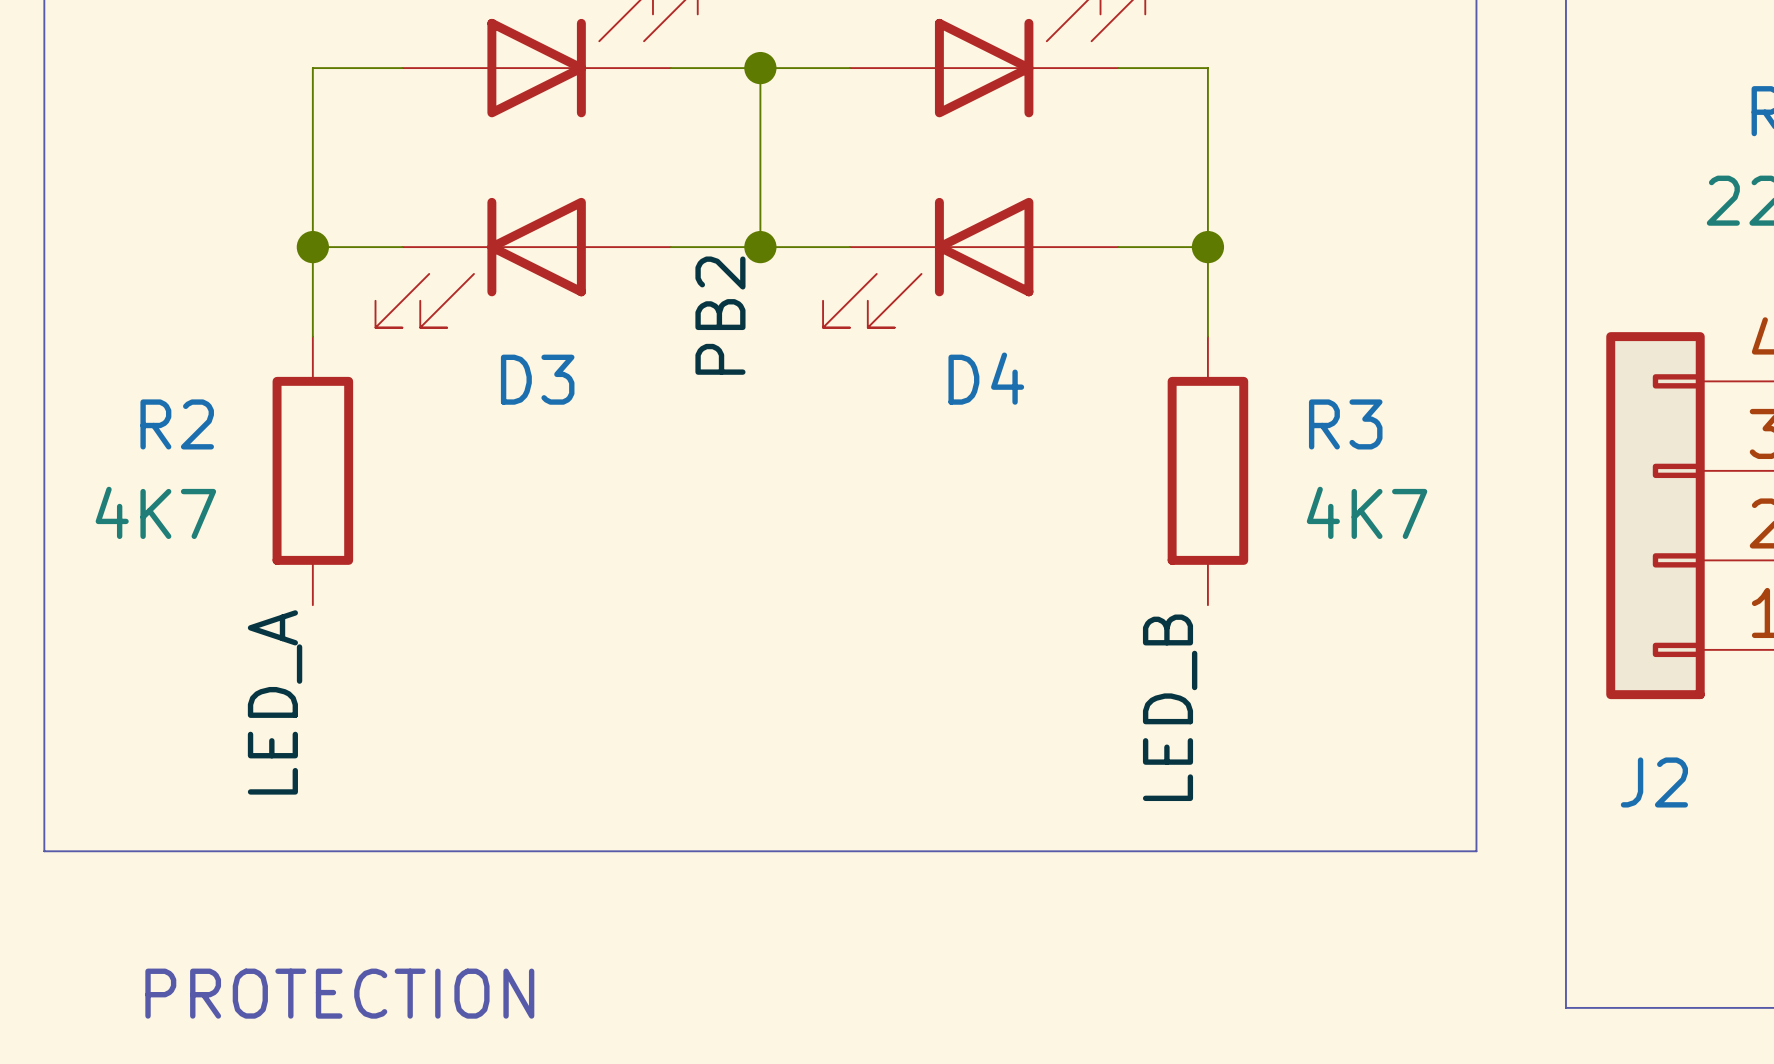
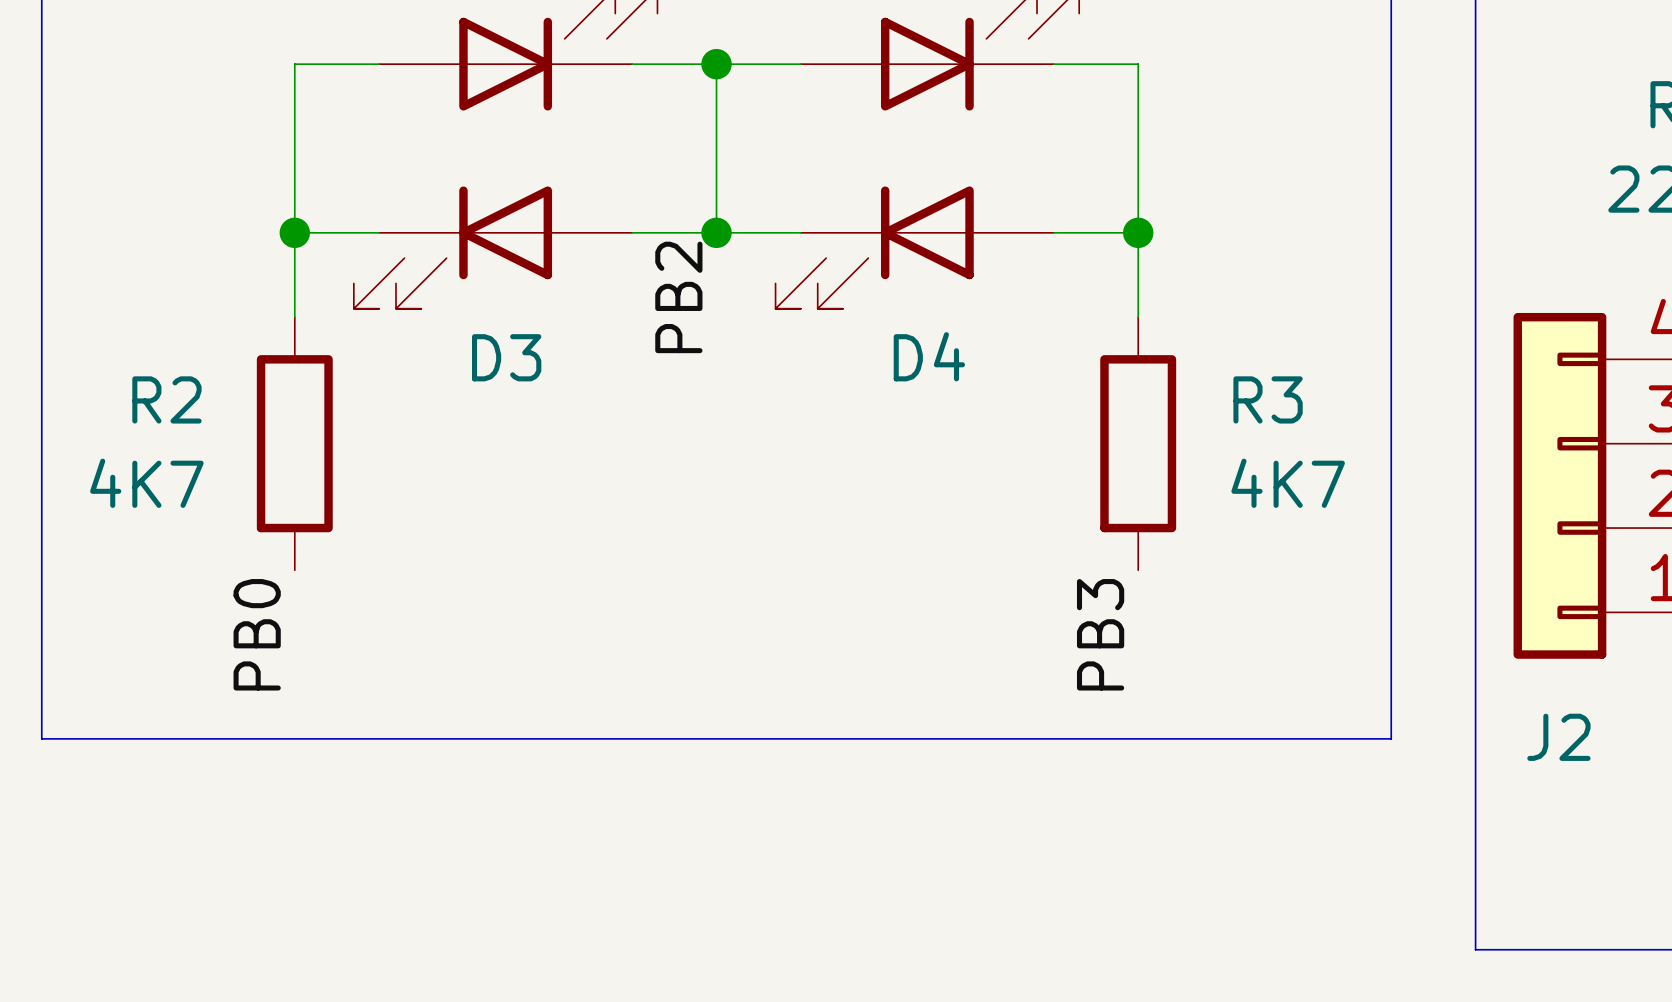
label: LED_A (275, 702) -> PB0 (257, 634)
label: LED_B (1170, 707) -> PB3 (1100, 634)
line: (44, 784) (44, 851) (1476, 851) (1476, 784) -> (41, 738) (1391, 738)
text: PROTECTION (339, 993) -> none

